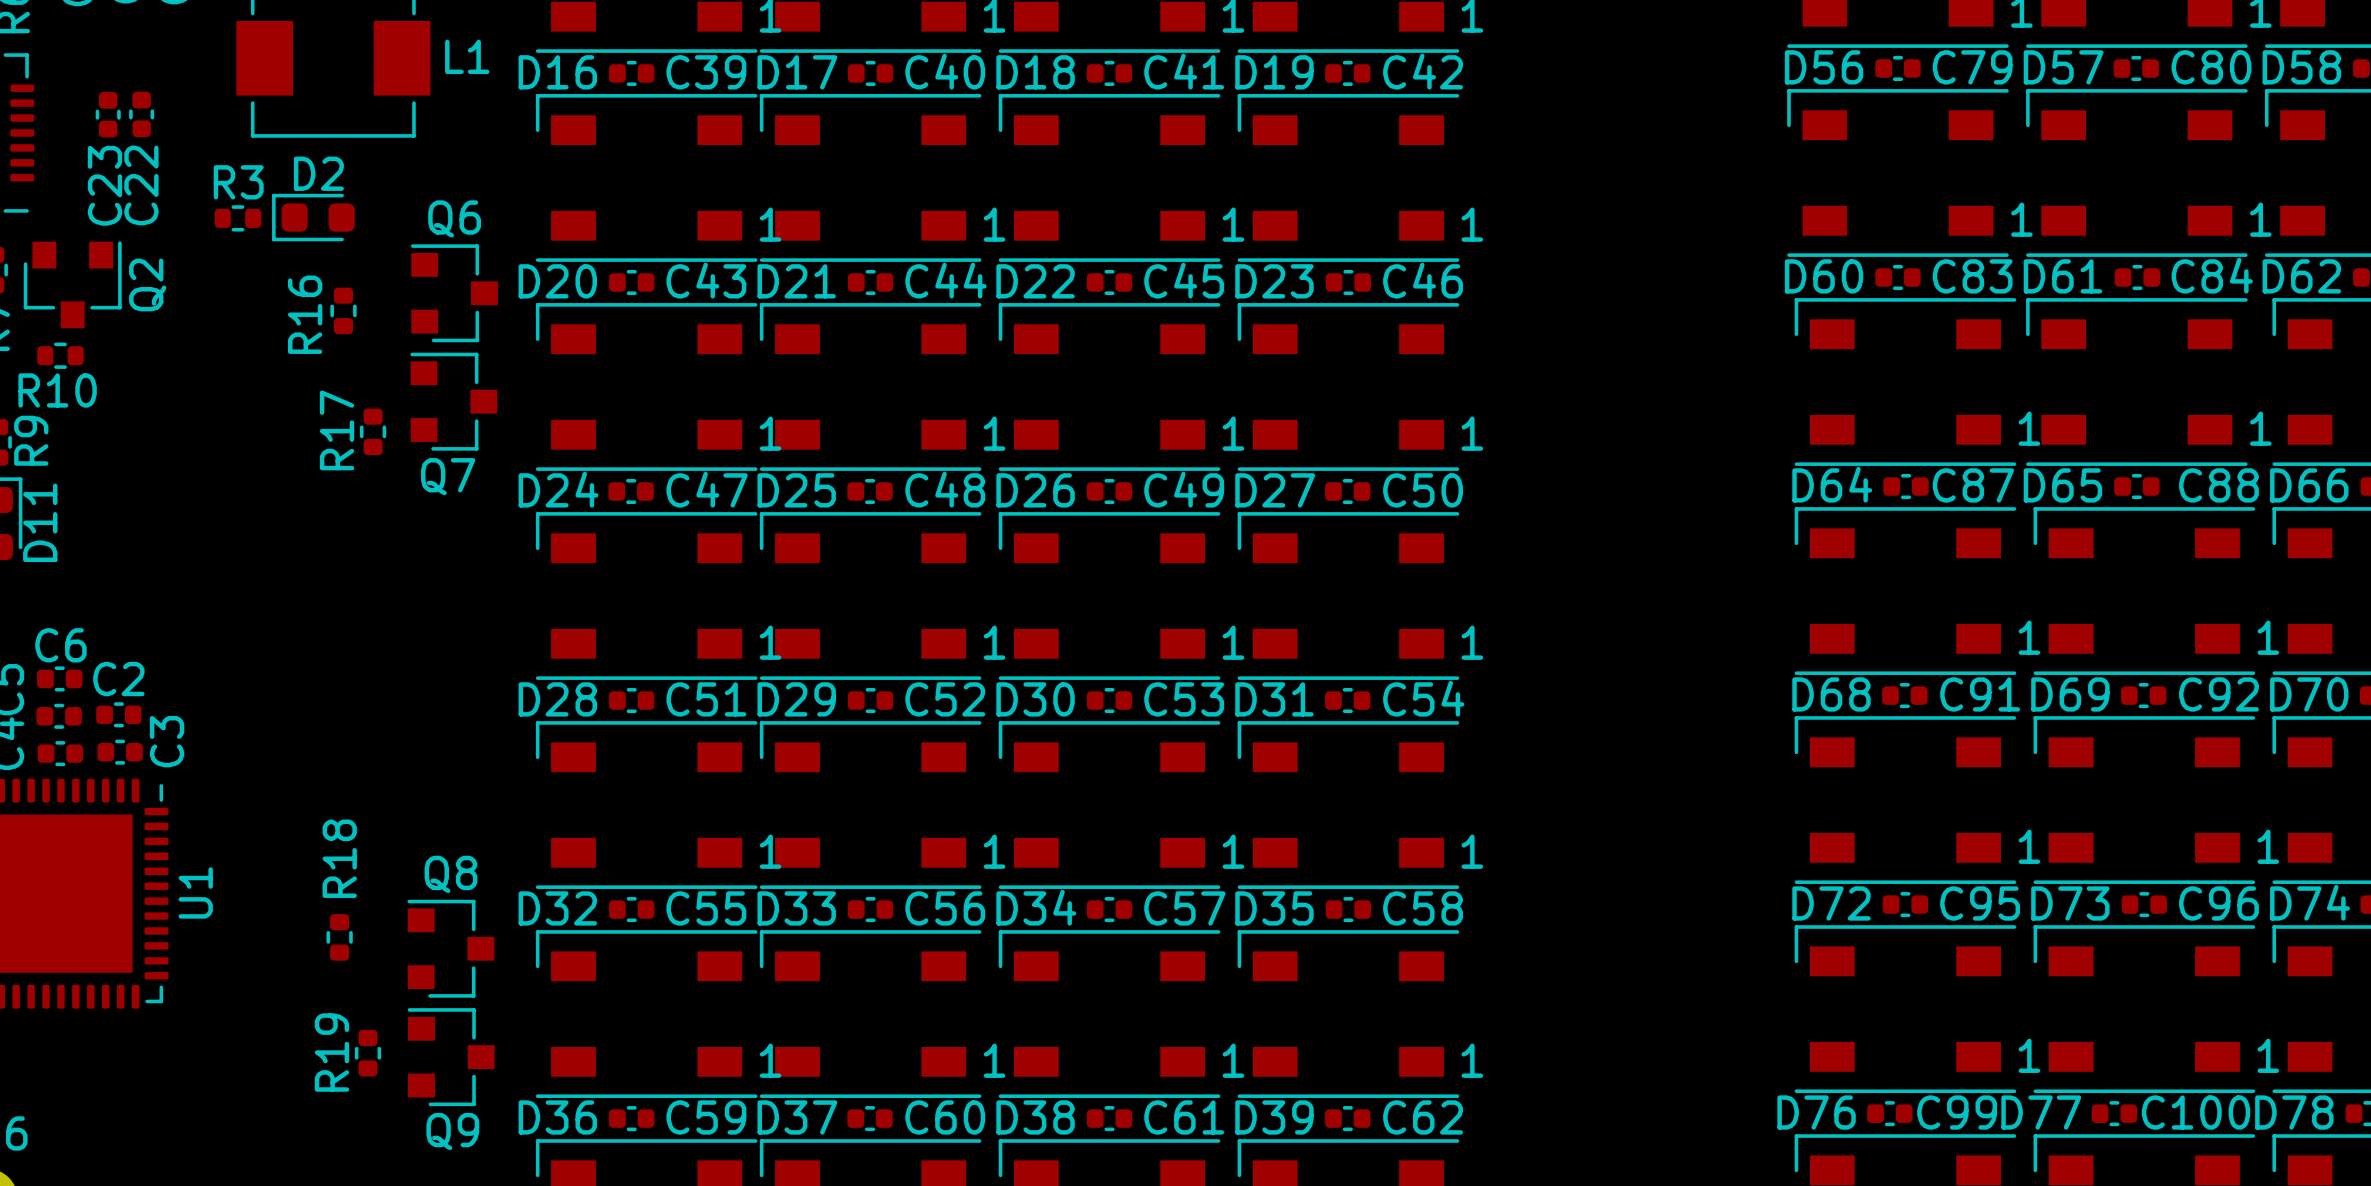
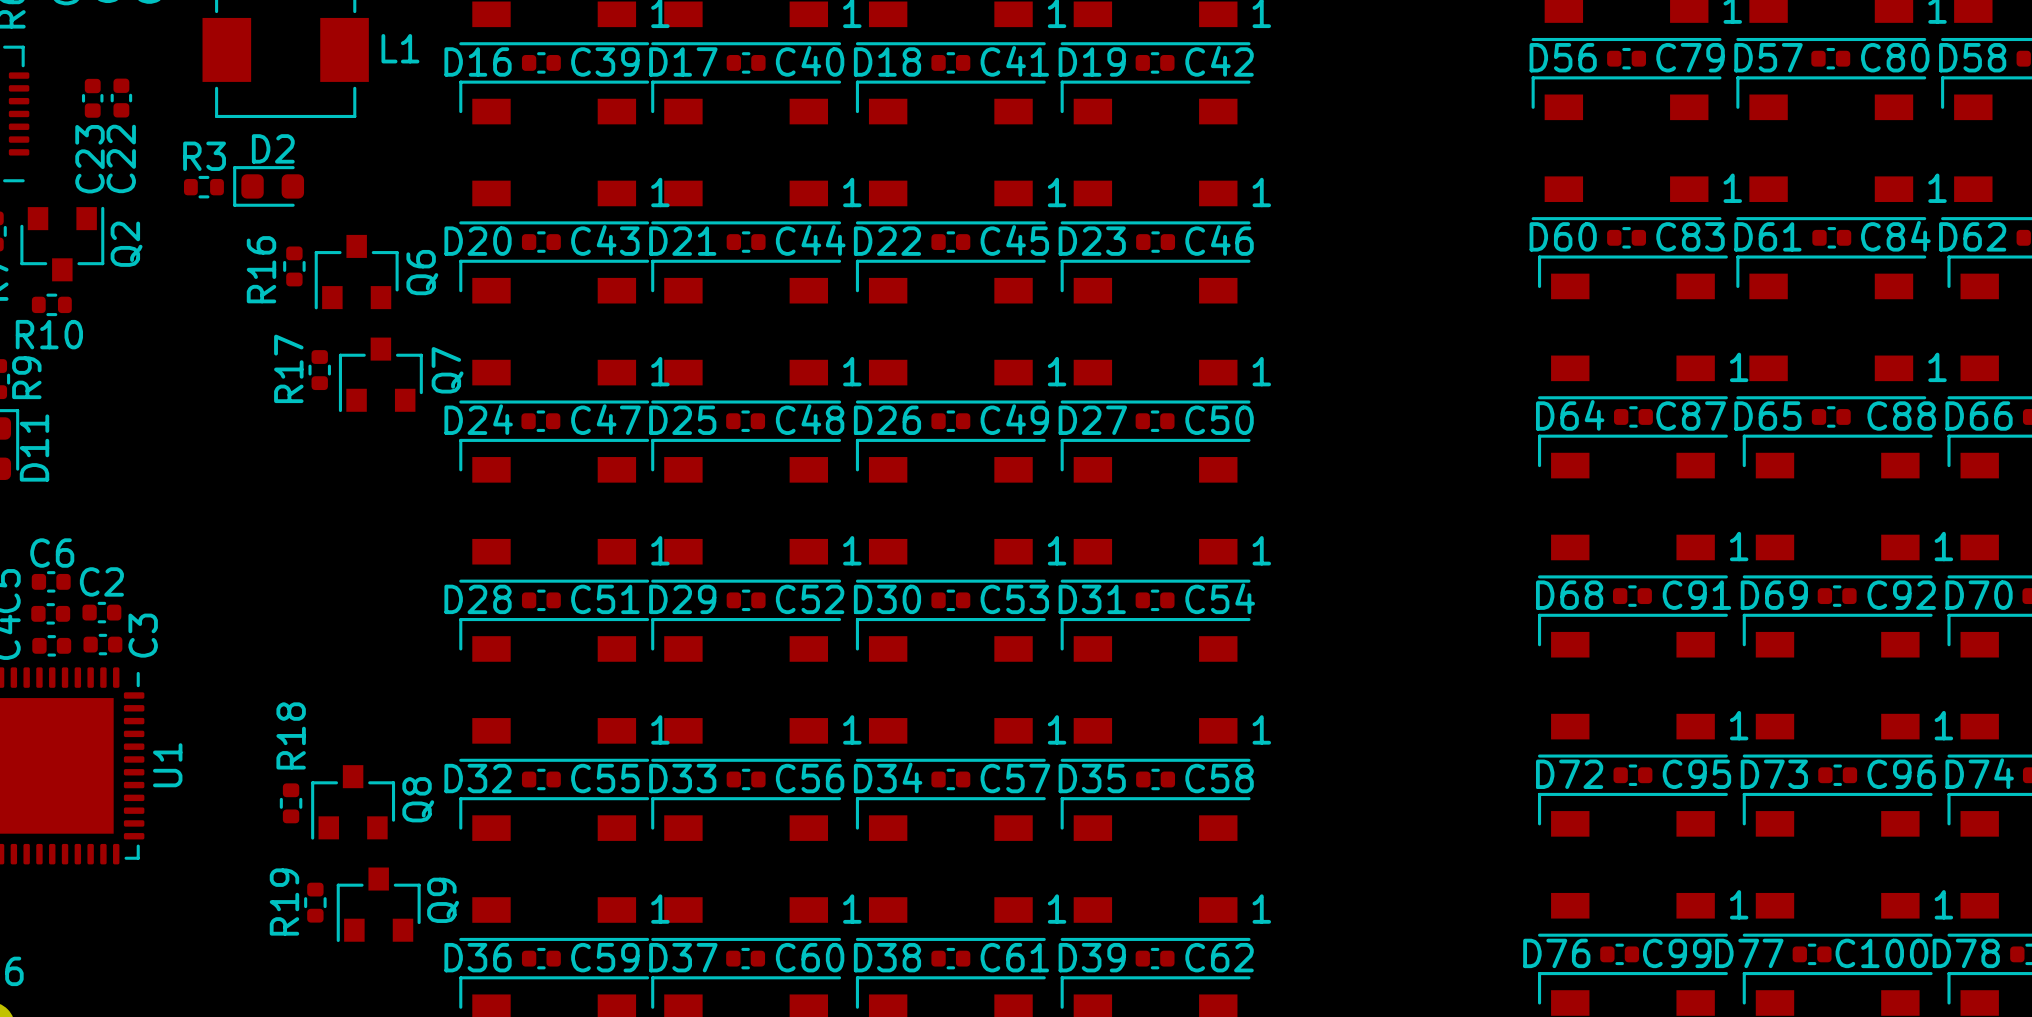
Q6 name position: Q6 (454, 218) -> Q6 (422, 272)
Q6 rotation: 0° (454, 293) -> 90° counterclockwise (356, 272)
Q7 rotation: 0° (453, 401) -> 90° counterclockwise (380, 374)
Q8 name position: Q8 (451, 874) -> Q8 (418, 799)
Q8 rotation: 0° (450, 948) -> 90° counterclockwise (353, 802)
Q9 rotation: 0° (451, 1057) -> 90° counterclockwise (378, 904)

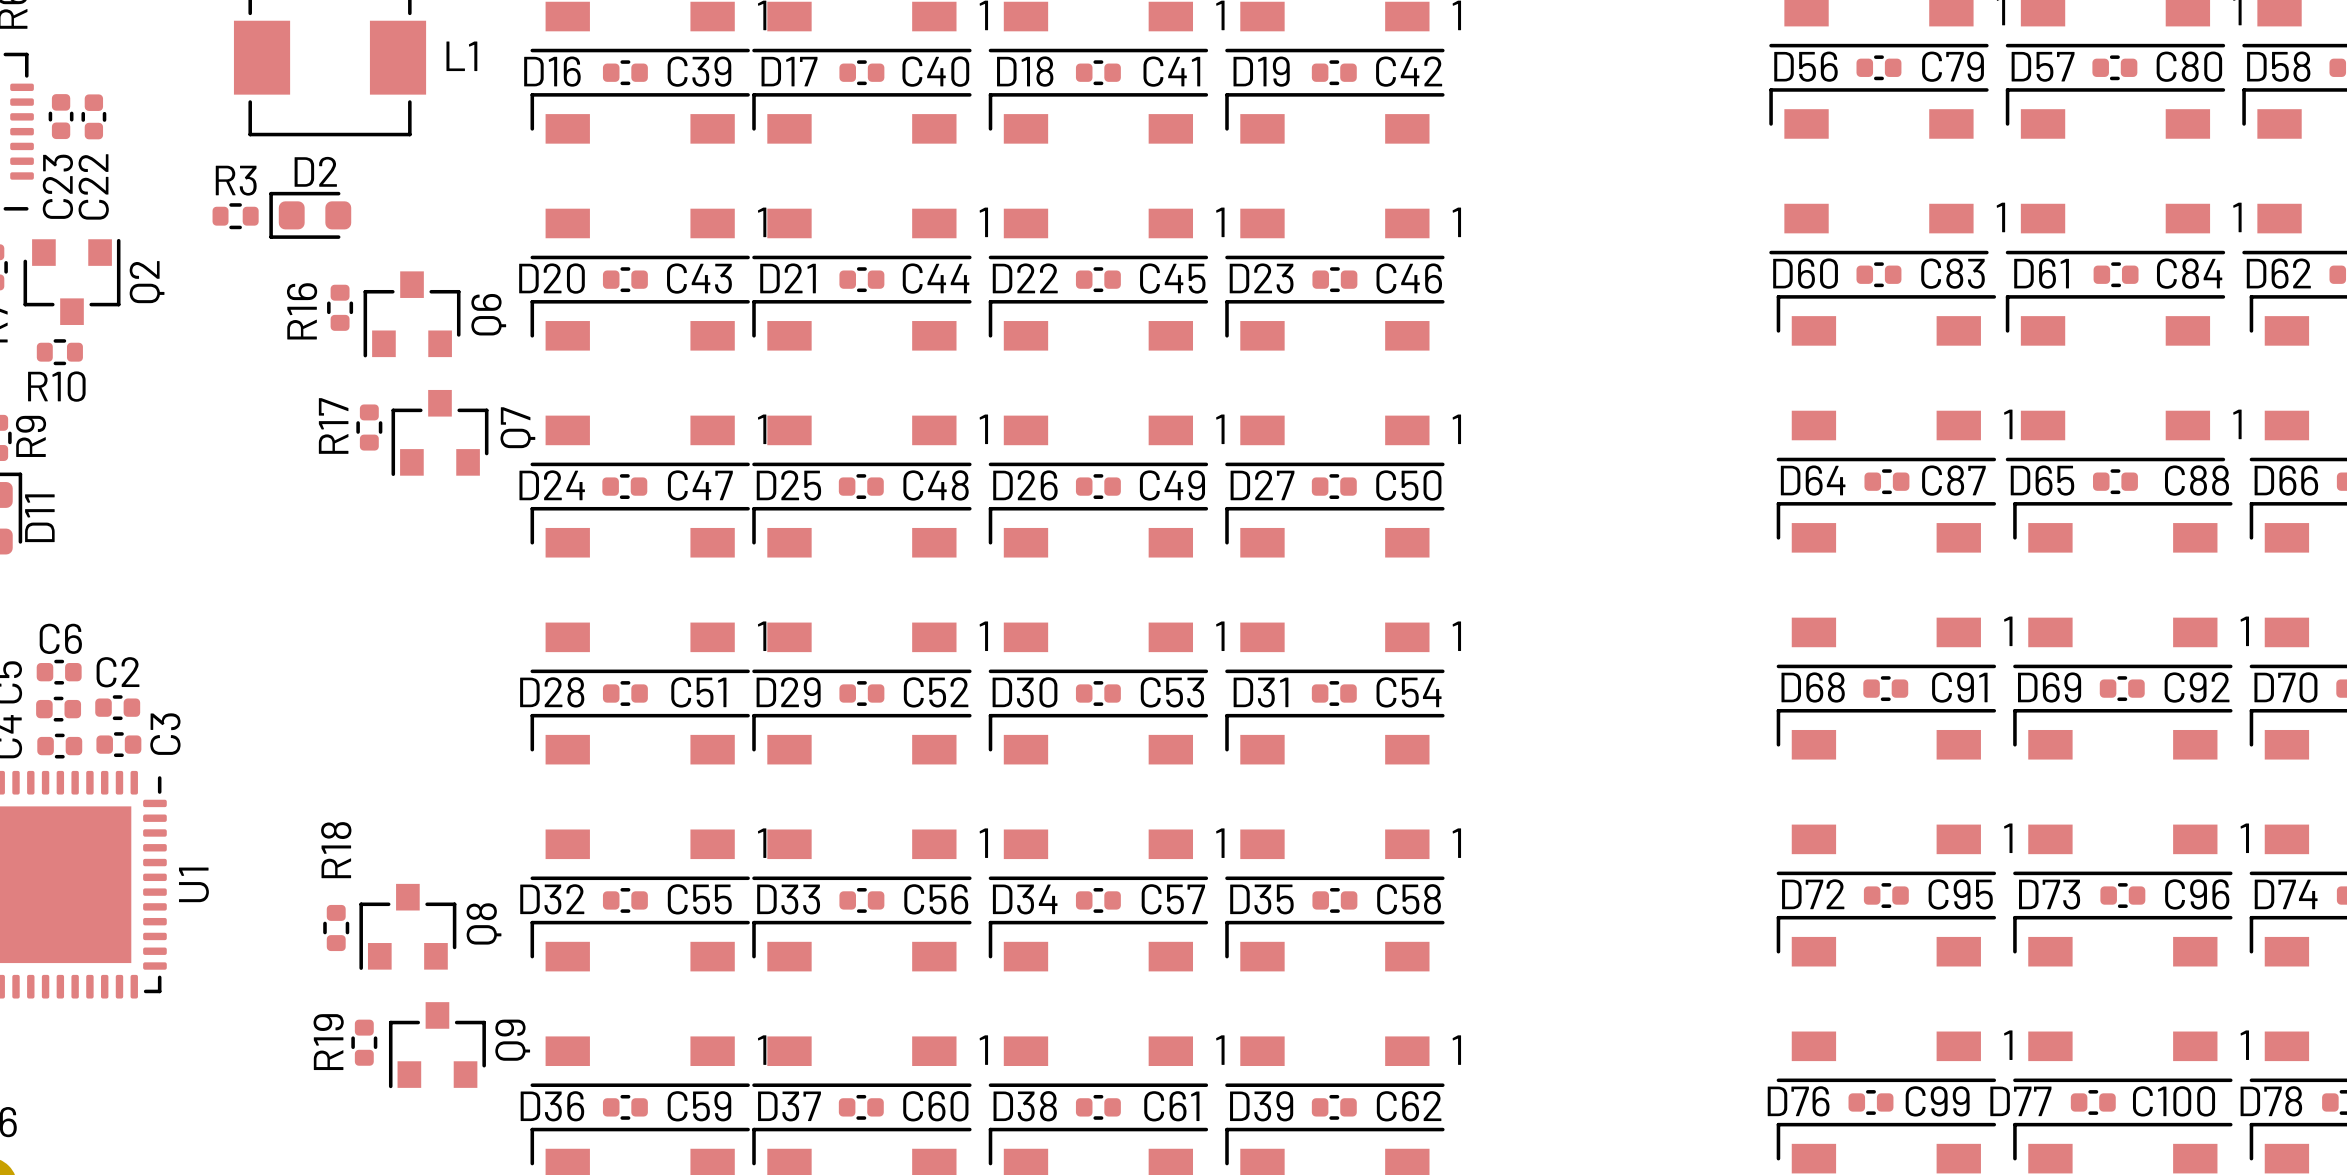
C23 position: (92, 98) -> (61, 116)
C22 position: (121, 98) -> (93, 116)

